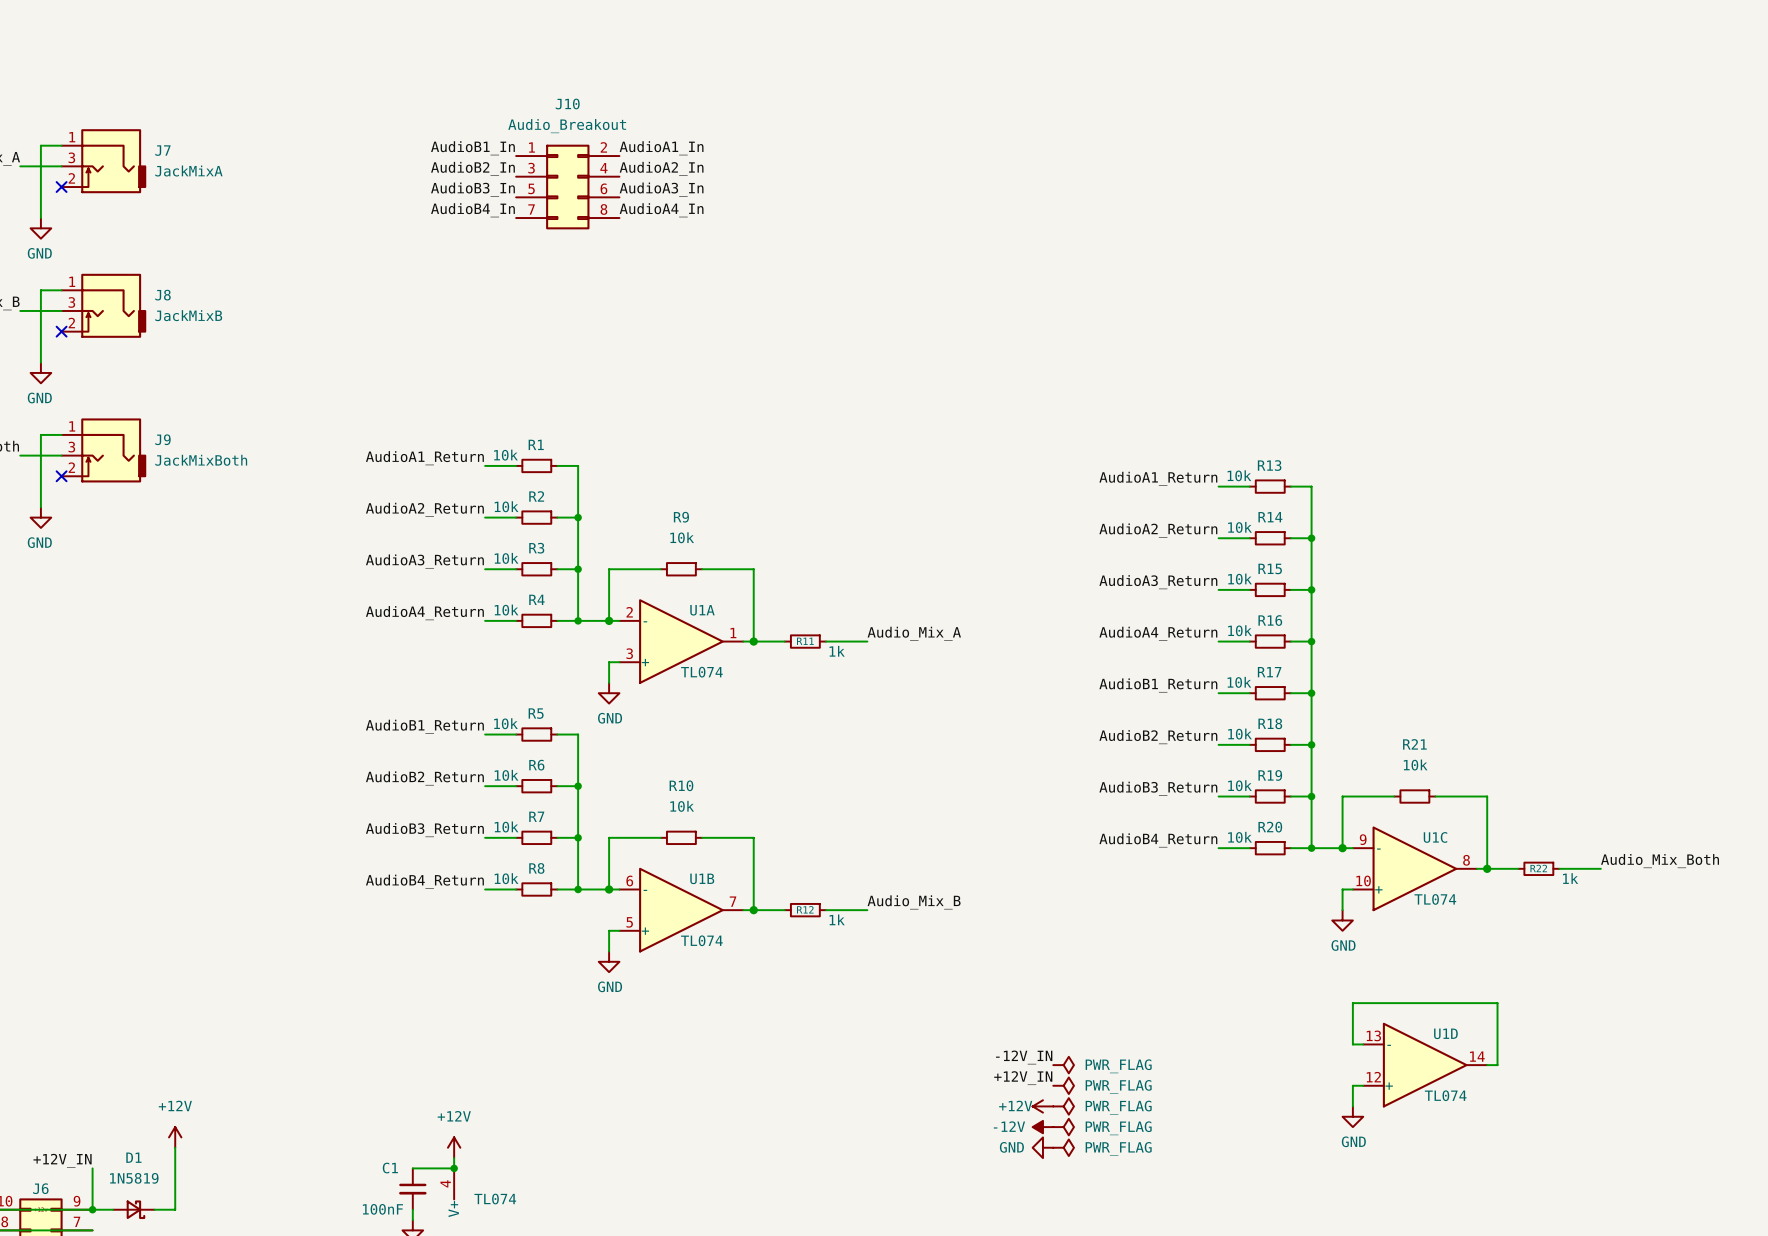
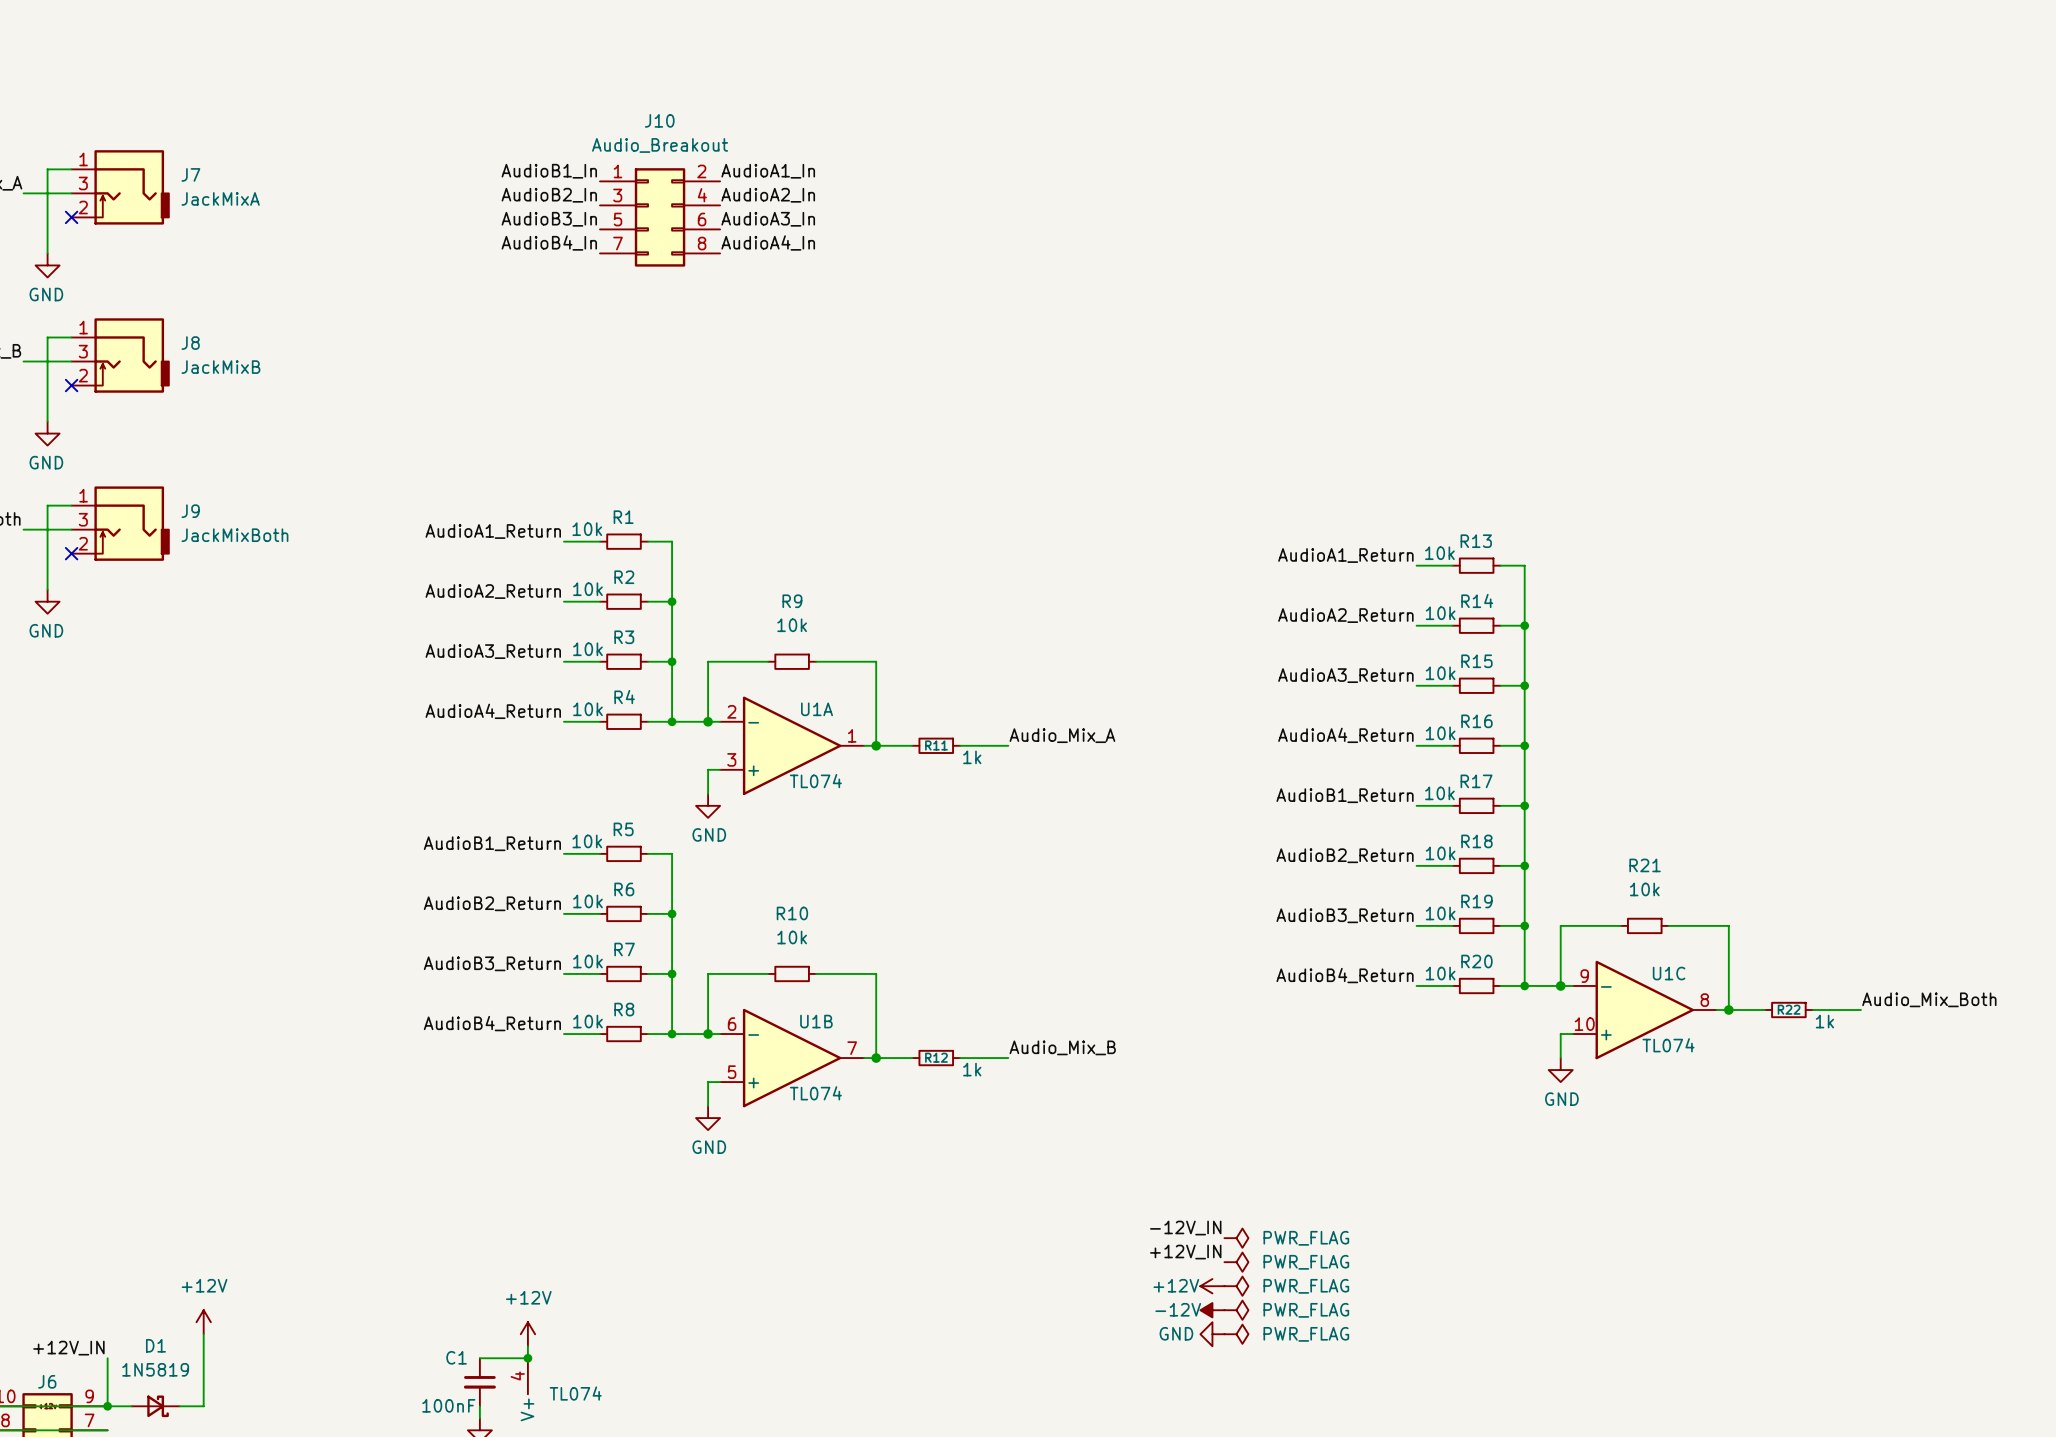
wire: (1363, 1044) (1352, 1044) (1352, 1003) (1497, 1003) (1497, 1065) (1487, 1065) -> none
U1D: TL074 (1425, 1065) -> none
wire: (1363, 1085) (1352, 1085) (1352, 1106) -> none
power symbol: GND (1352, 1116) -> none

